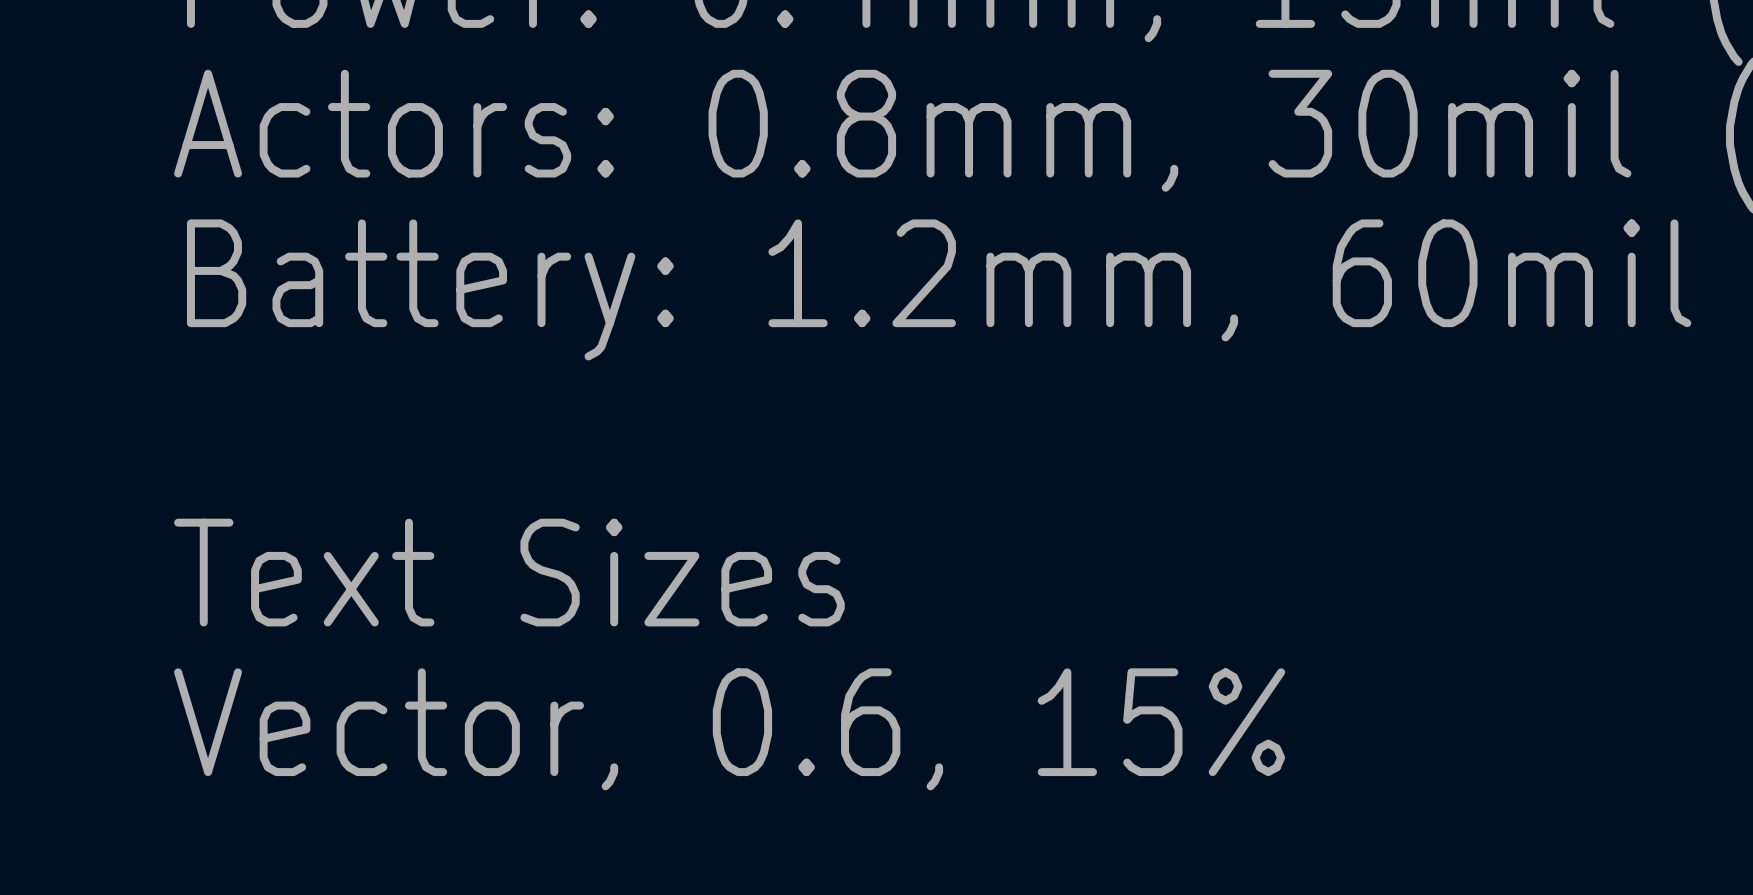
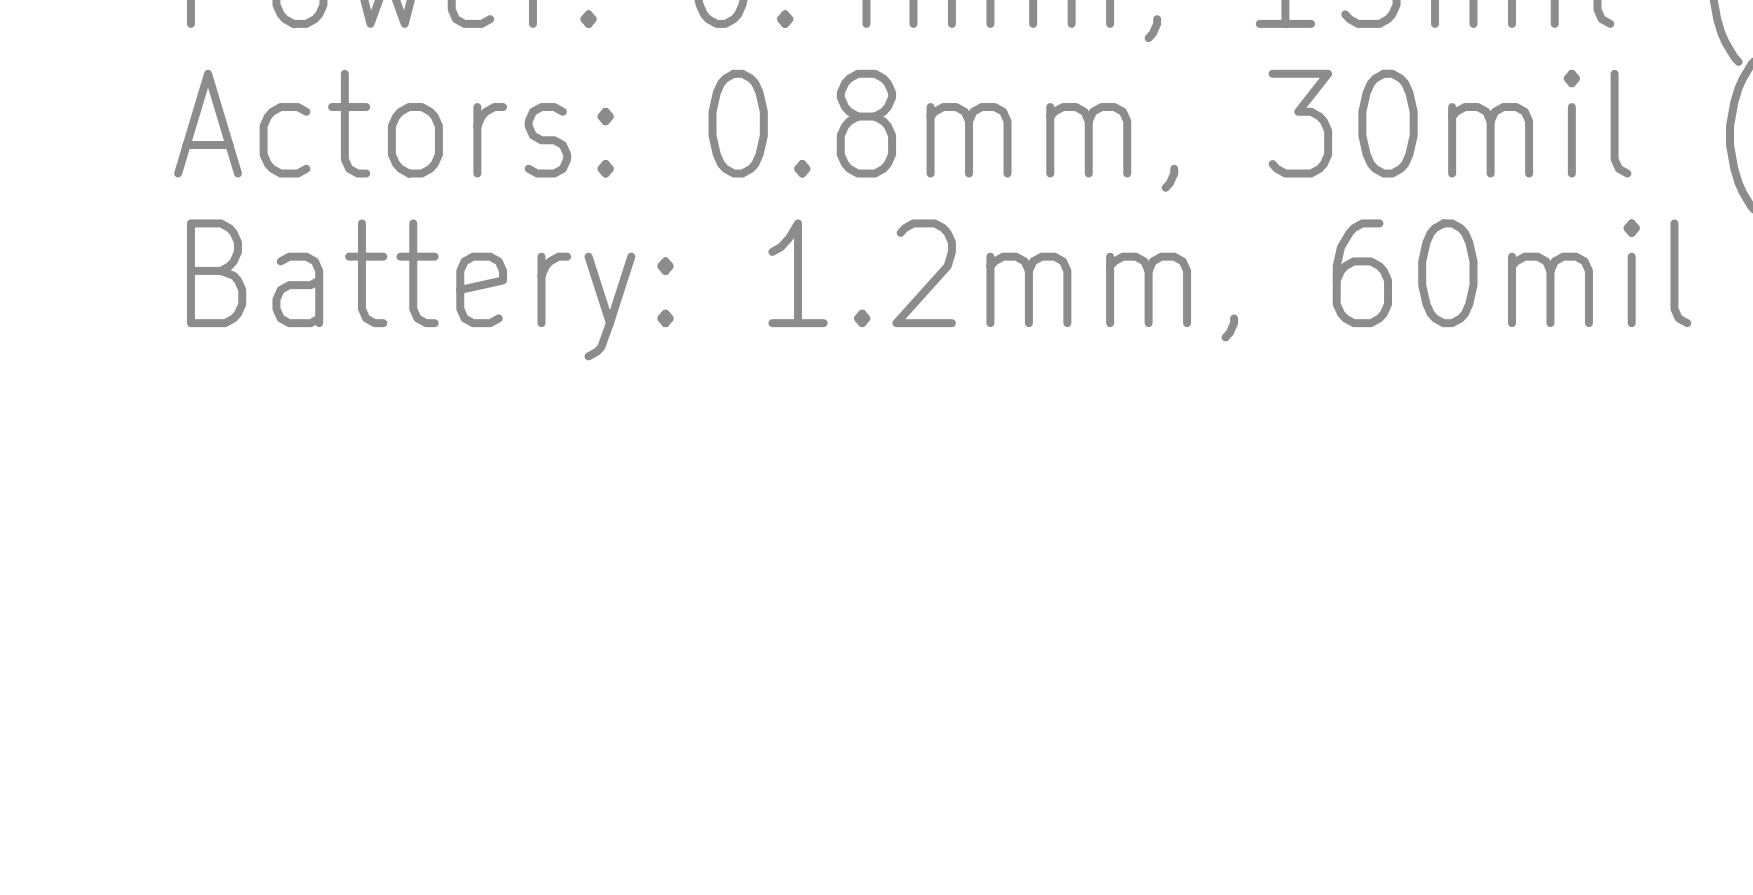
text: Text Sizes (509, 572) -> none
text: Vector, 0.6, 15% (729, 729) -> none

